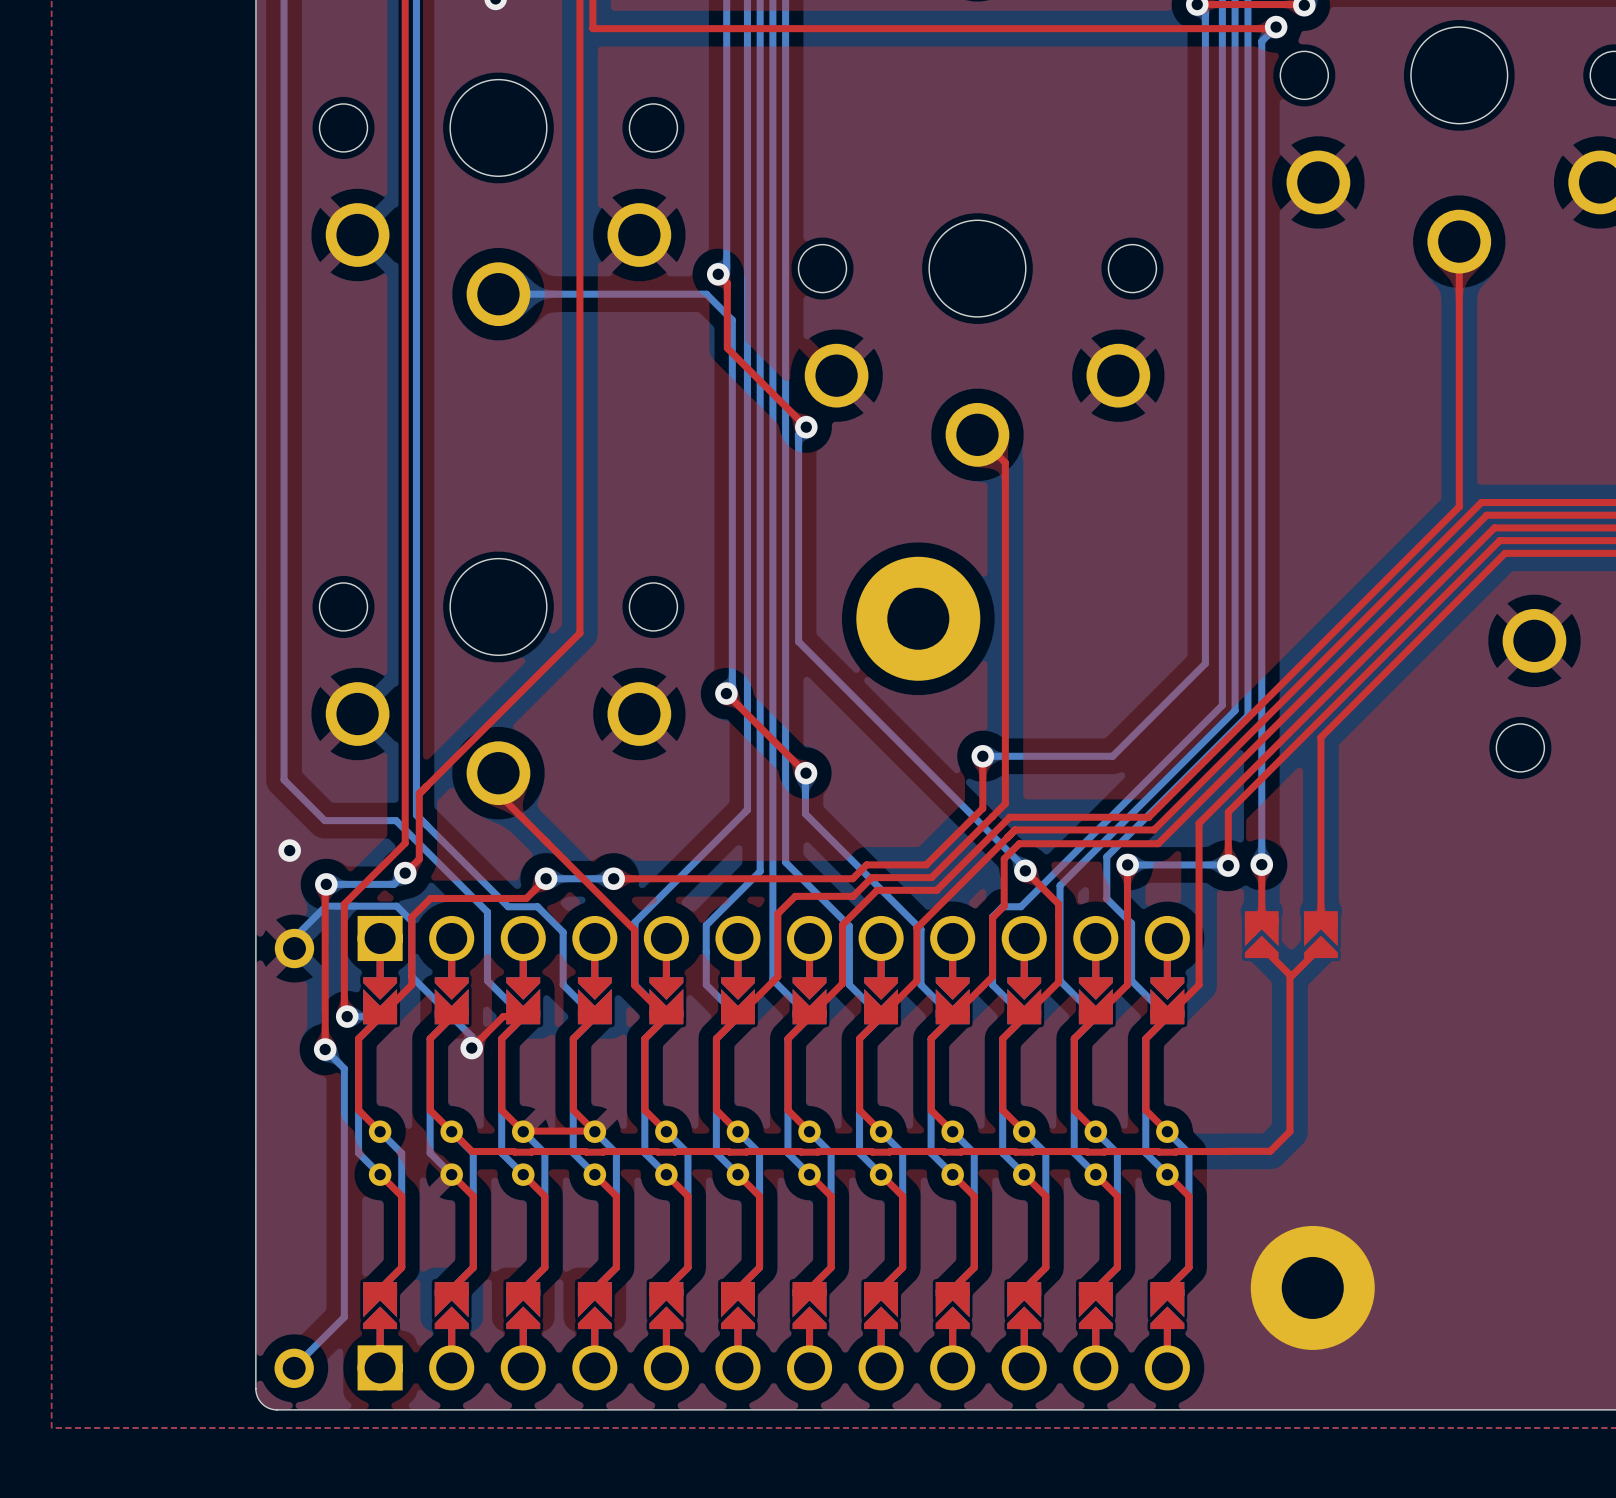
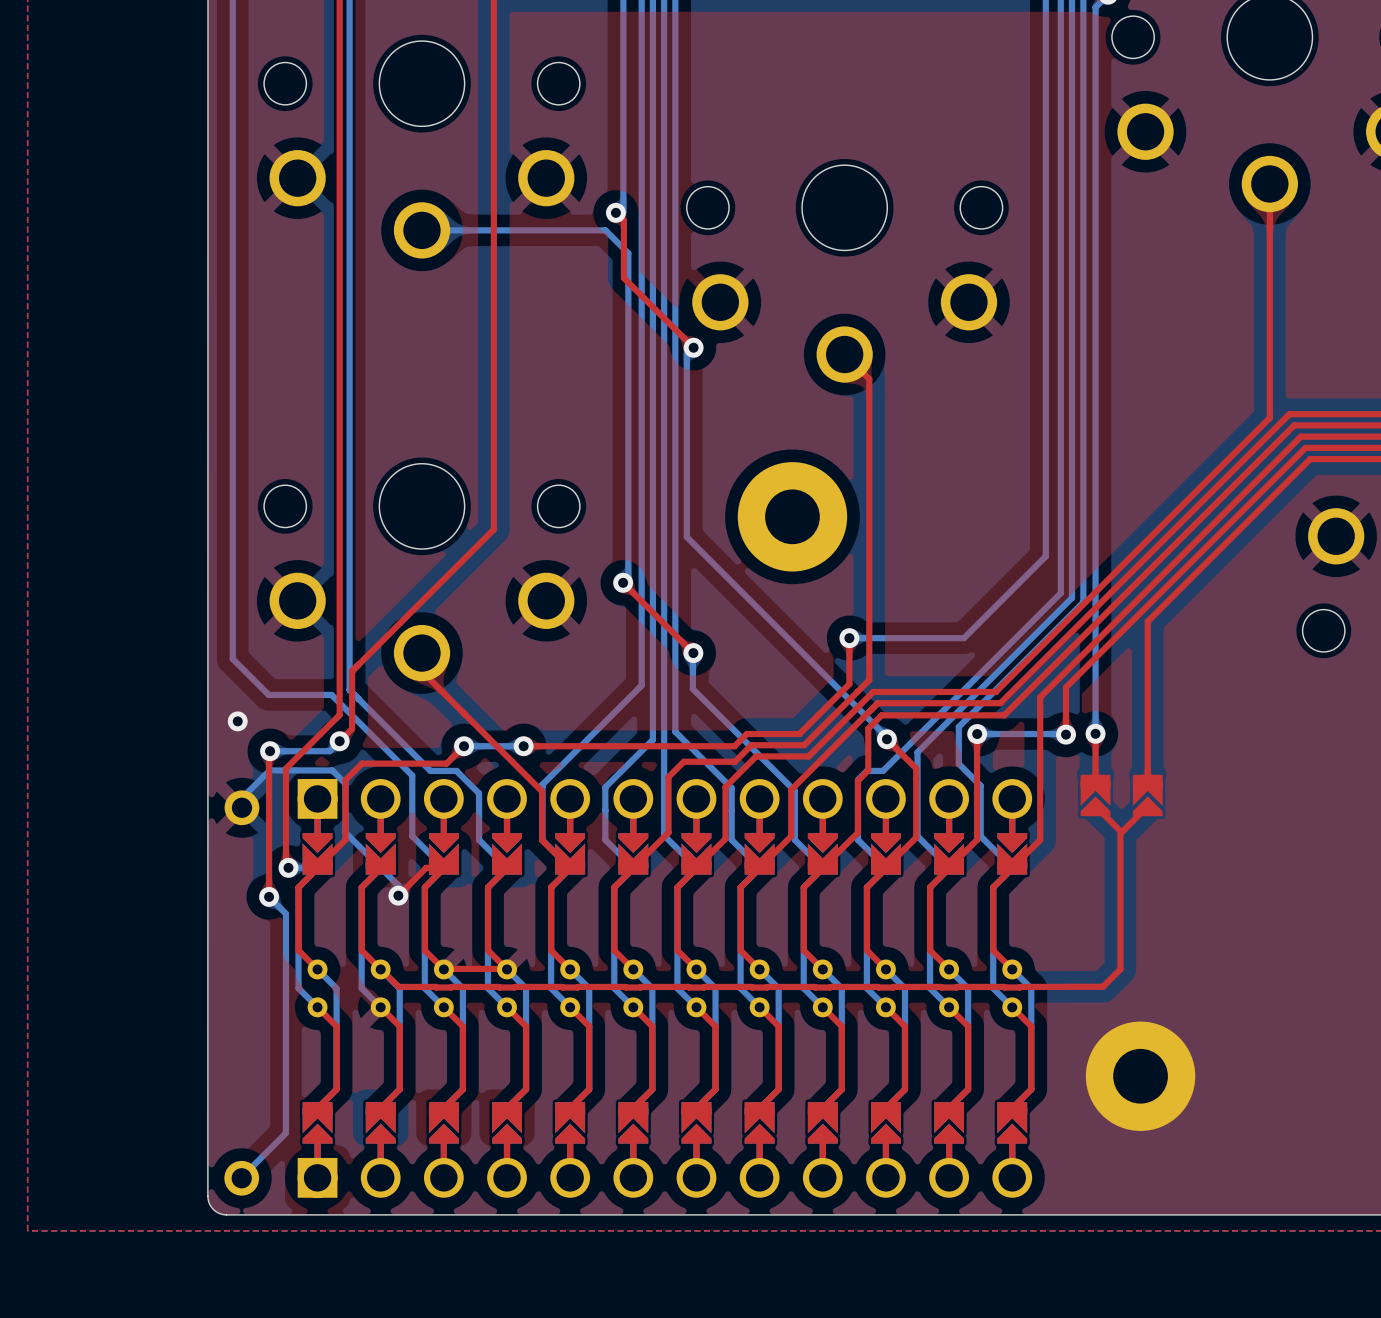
part position: (1312, 1287) -> (1140, 1076)

